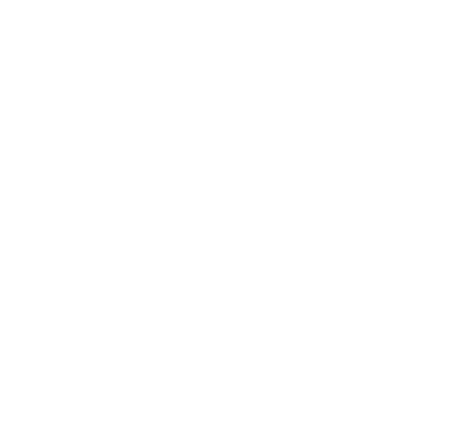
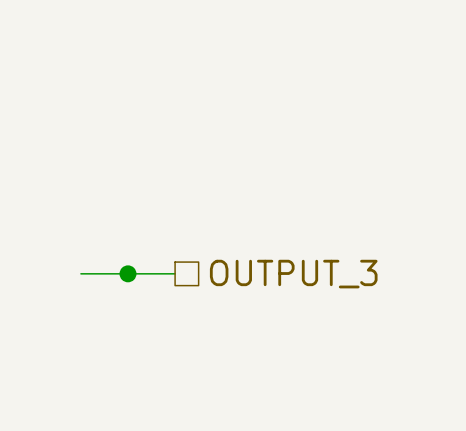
wire: none -> (80, 273) (175, 273)
junction: none -> (127, 273)
hierarchical label: none -> OUTPUT_3 (293, 274)

